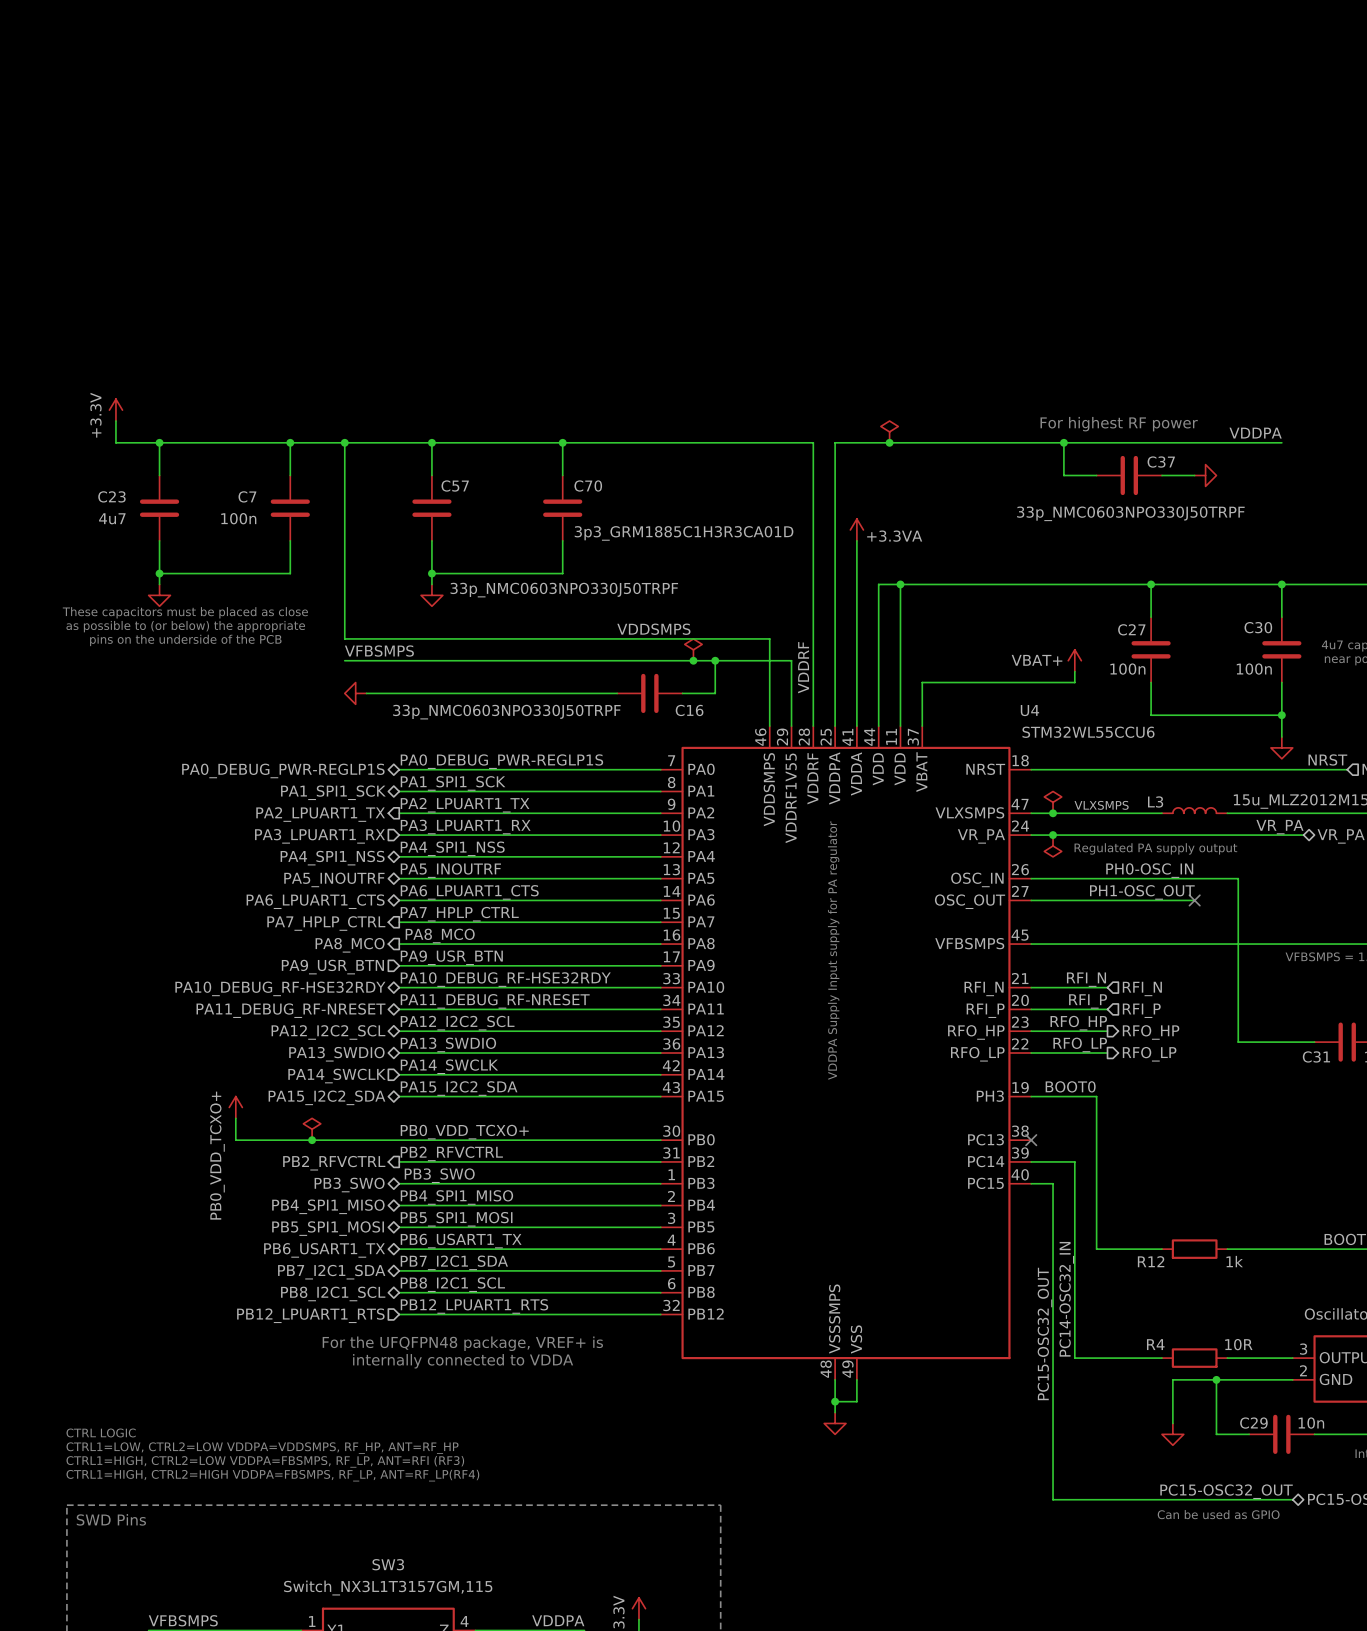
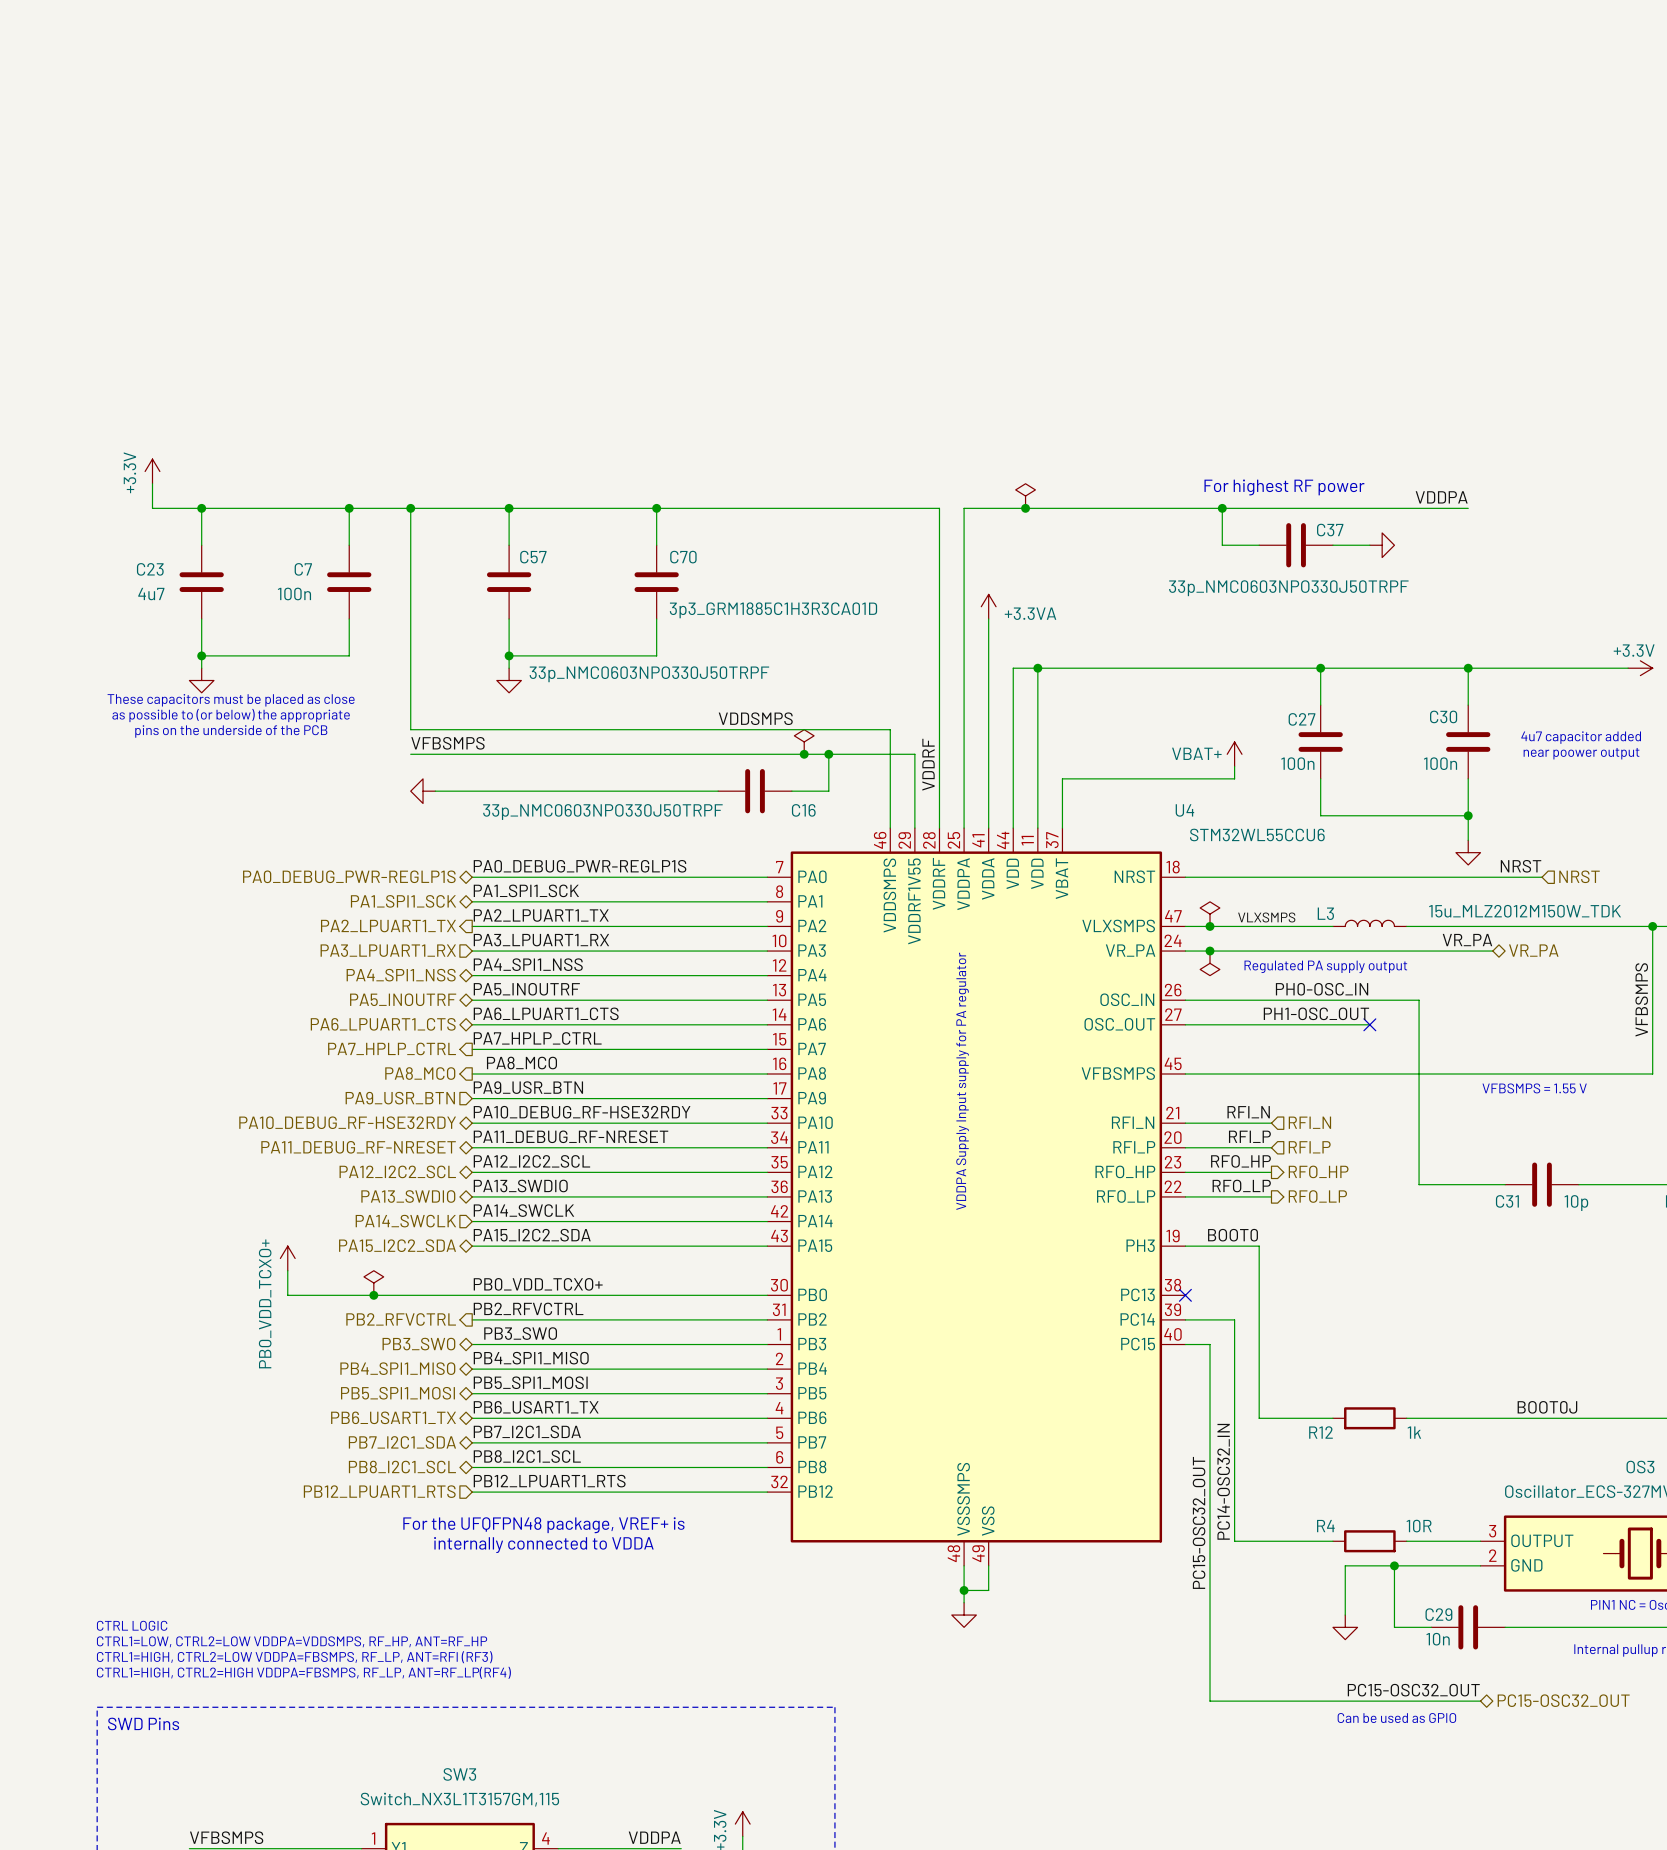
C29 value position: 10n (1311, 1423) -> 10n (1438, 1639)

